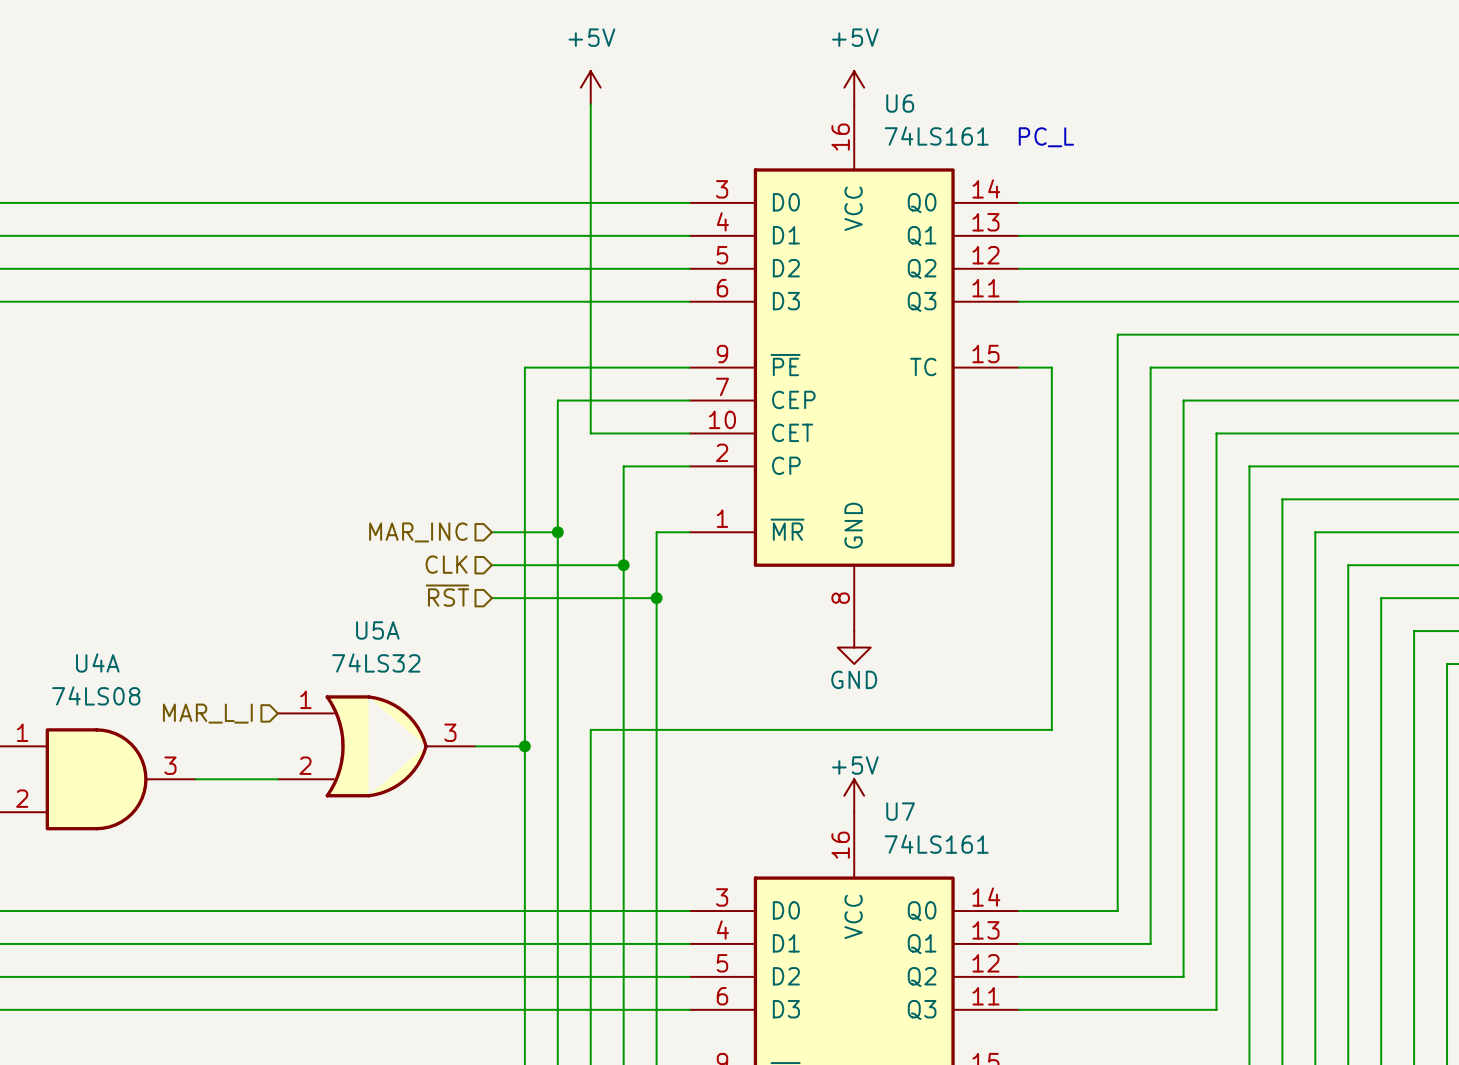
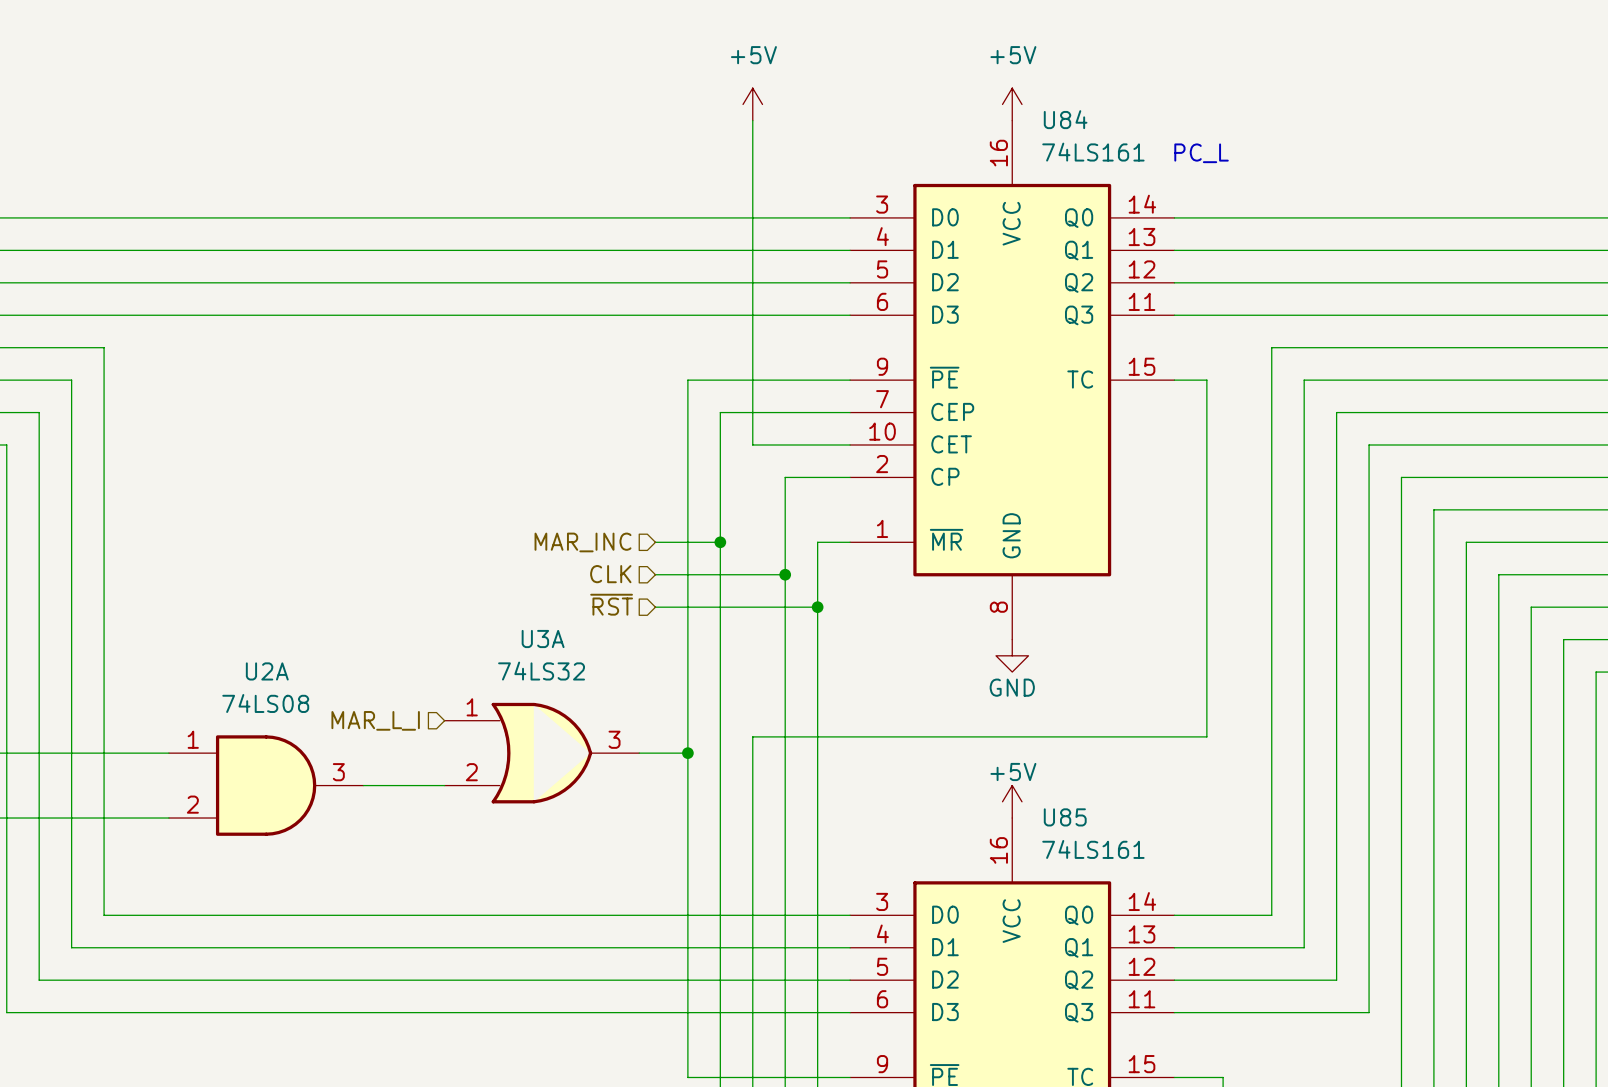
U6 name: U6 (900, 103) -> U84 (1065, 119)
U5A name: U5A (377, 630) -> U3A (543, 639)
U4A name: U4A (97, 663) -> U2A (267, 671)
U7 name: U7 (900, 811) -> U85 (1065, 817)

